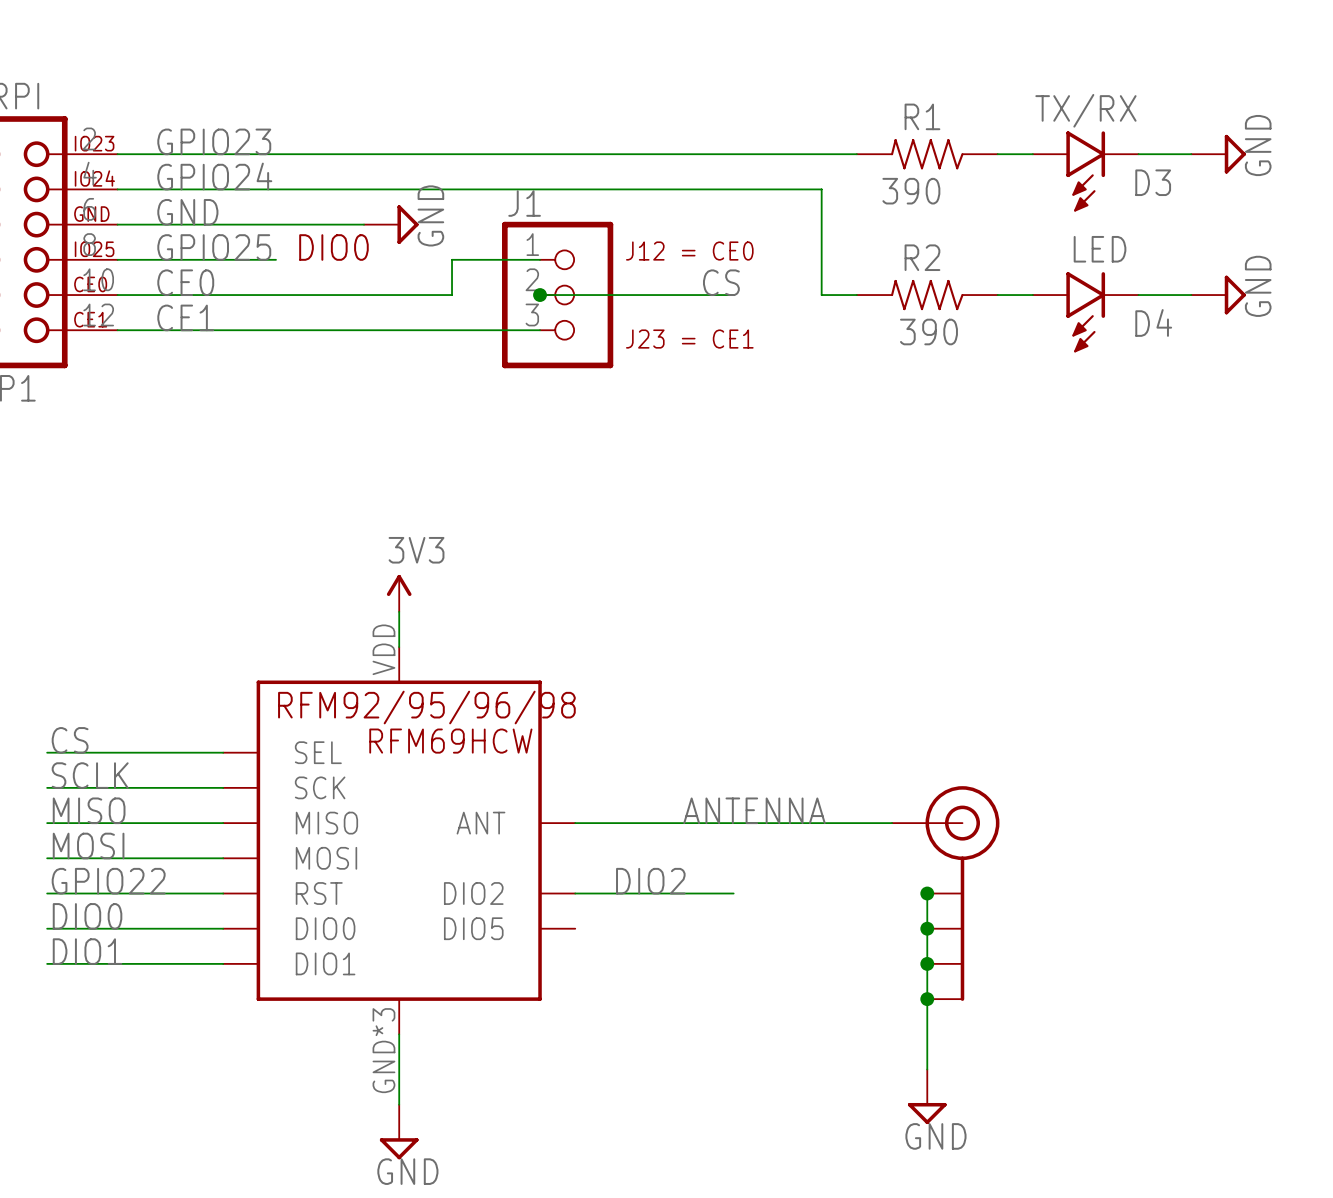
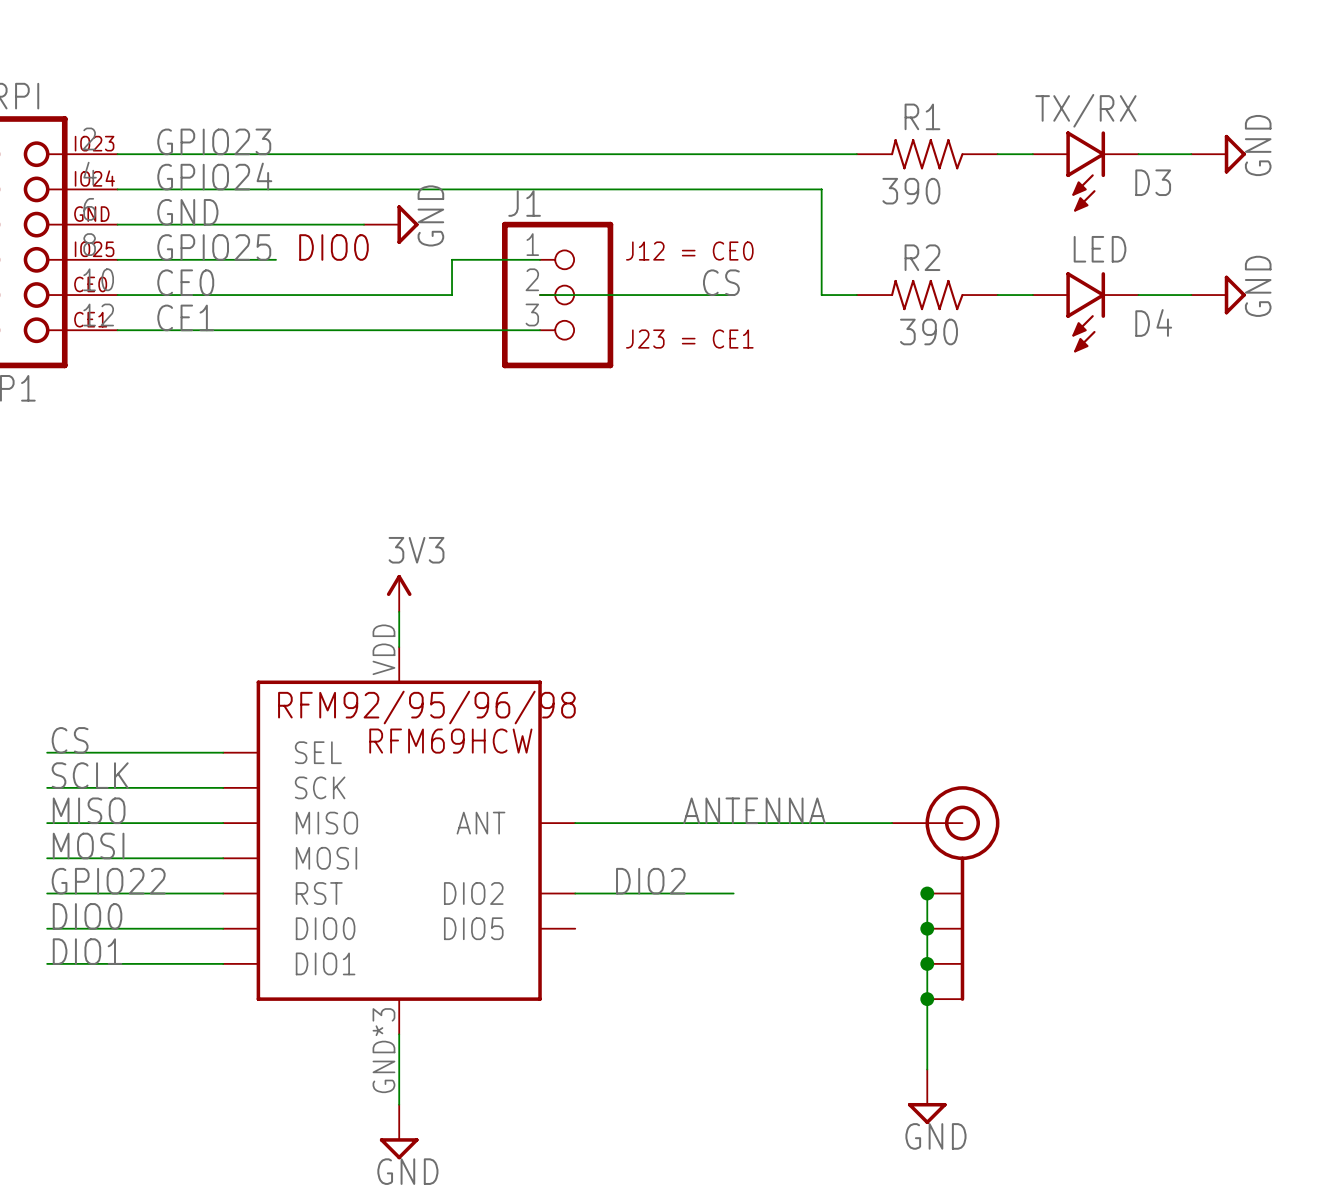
junction: (540, 295) -> none

